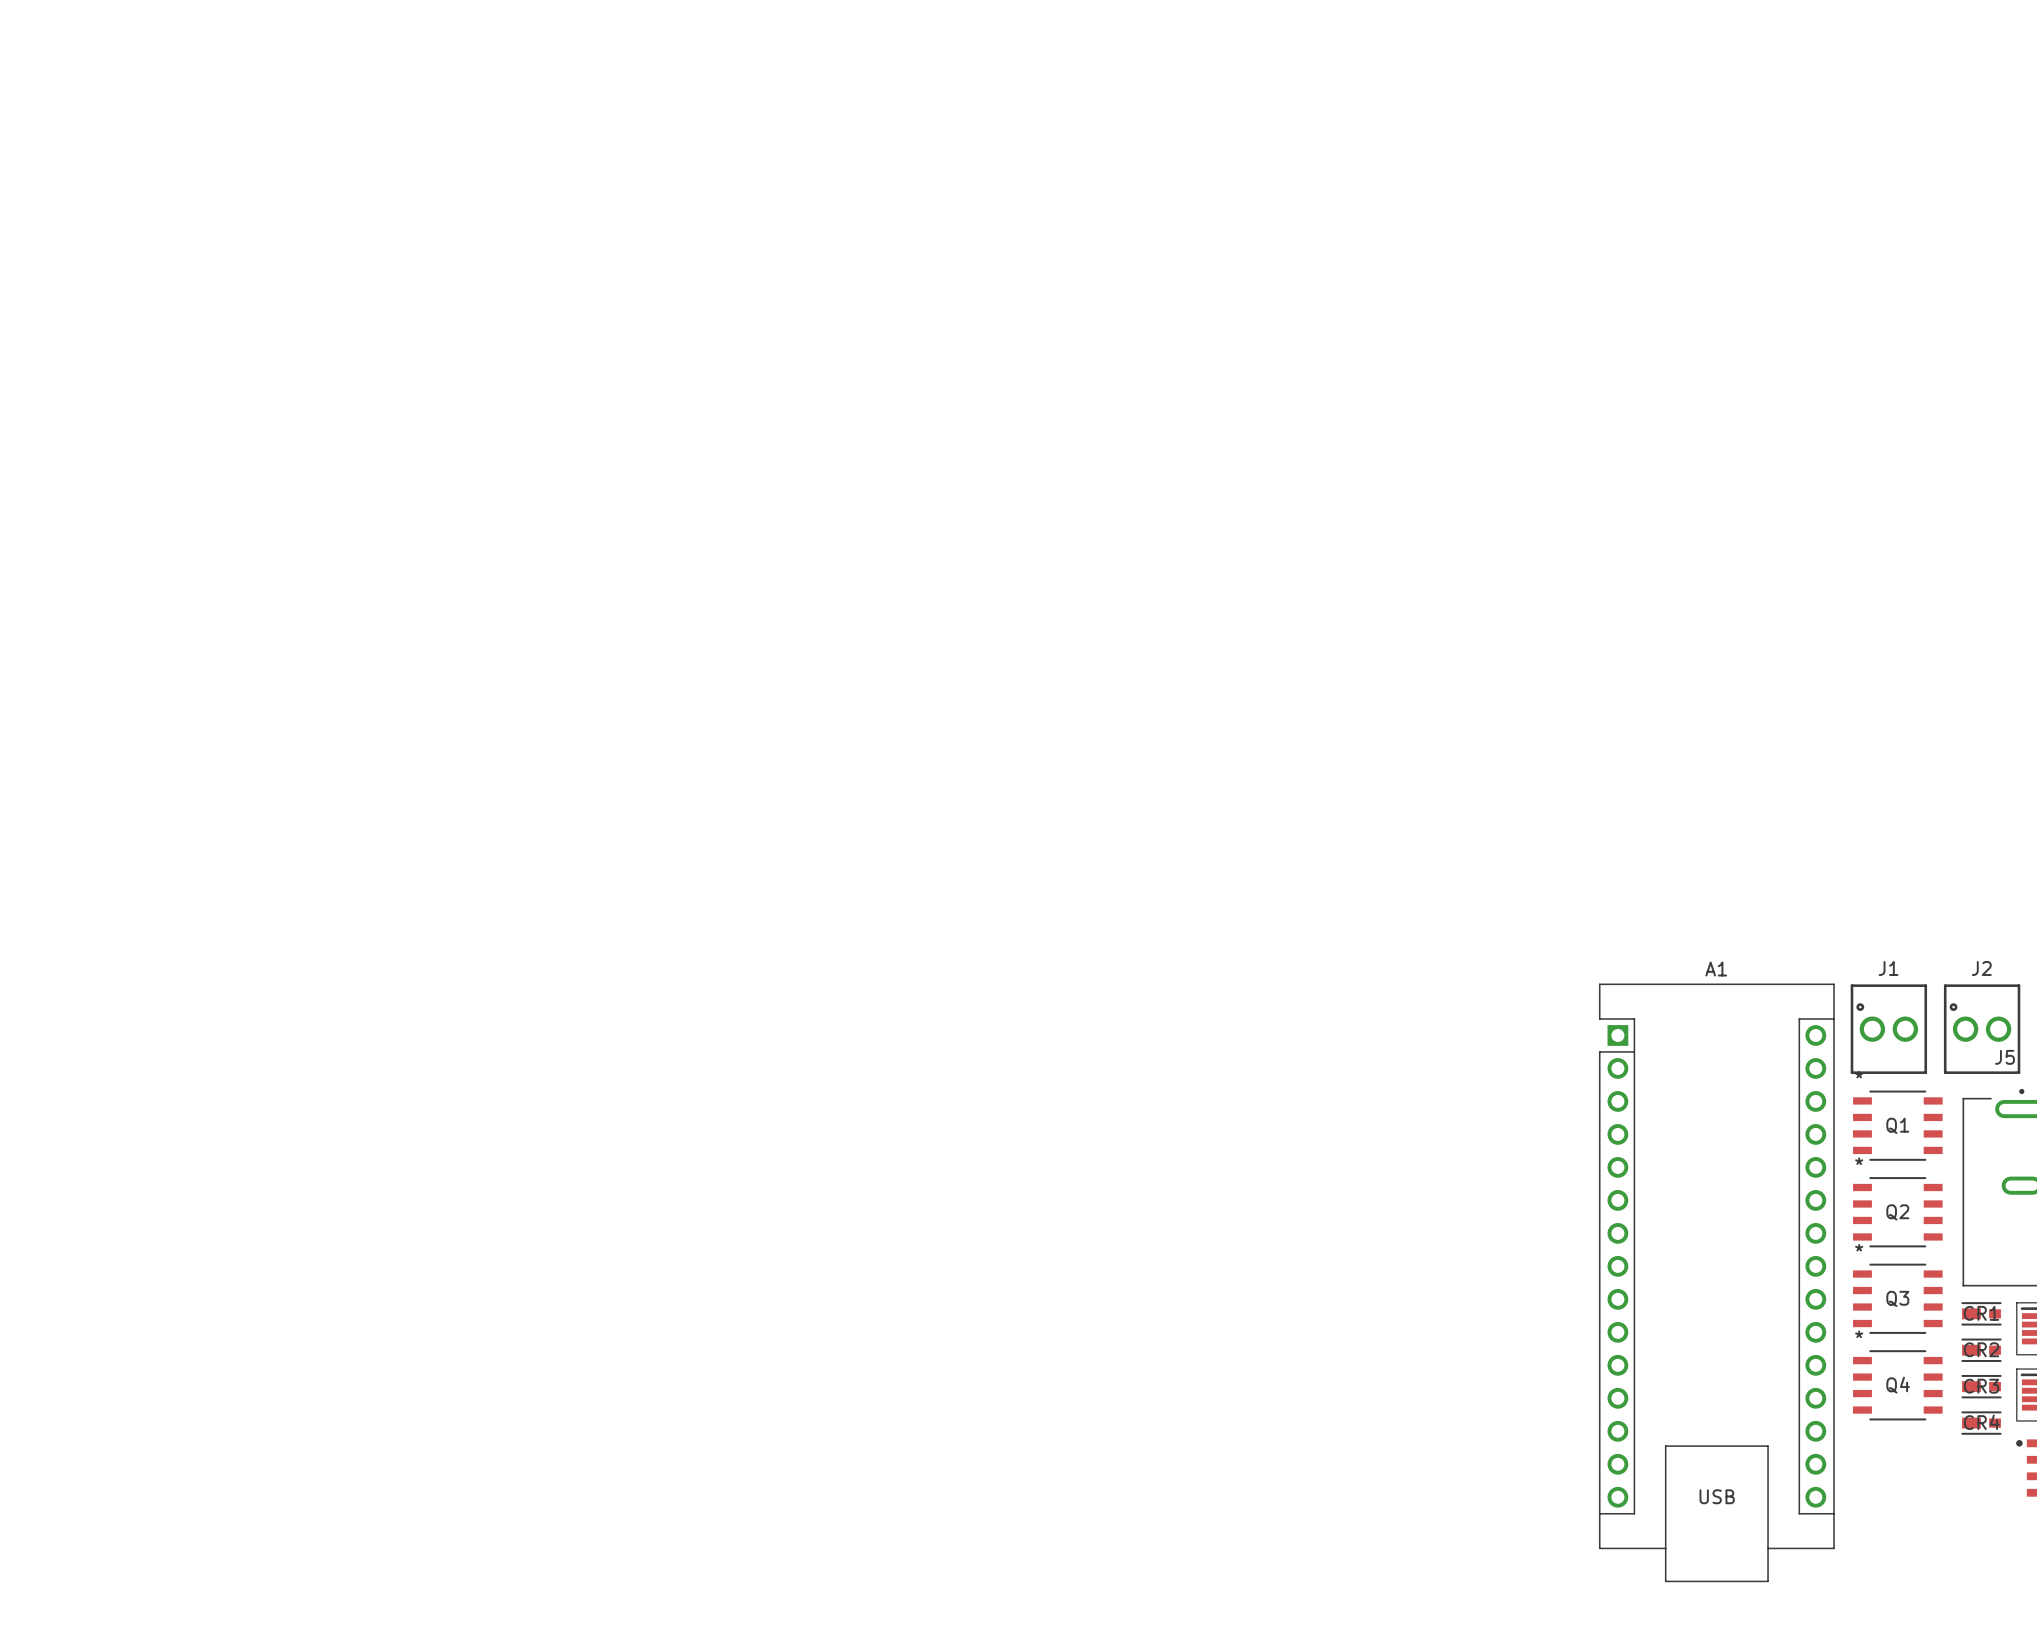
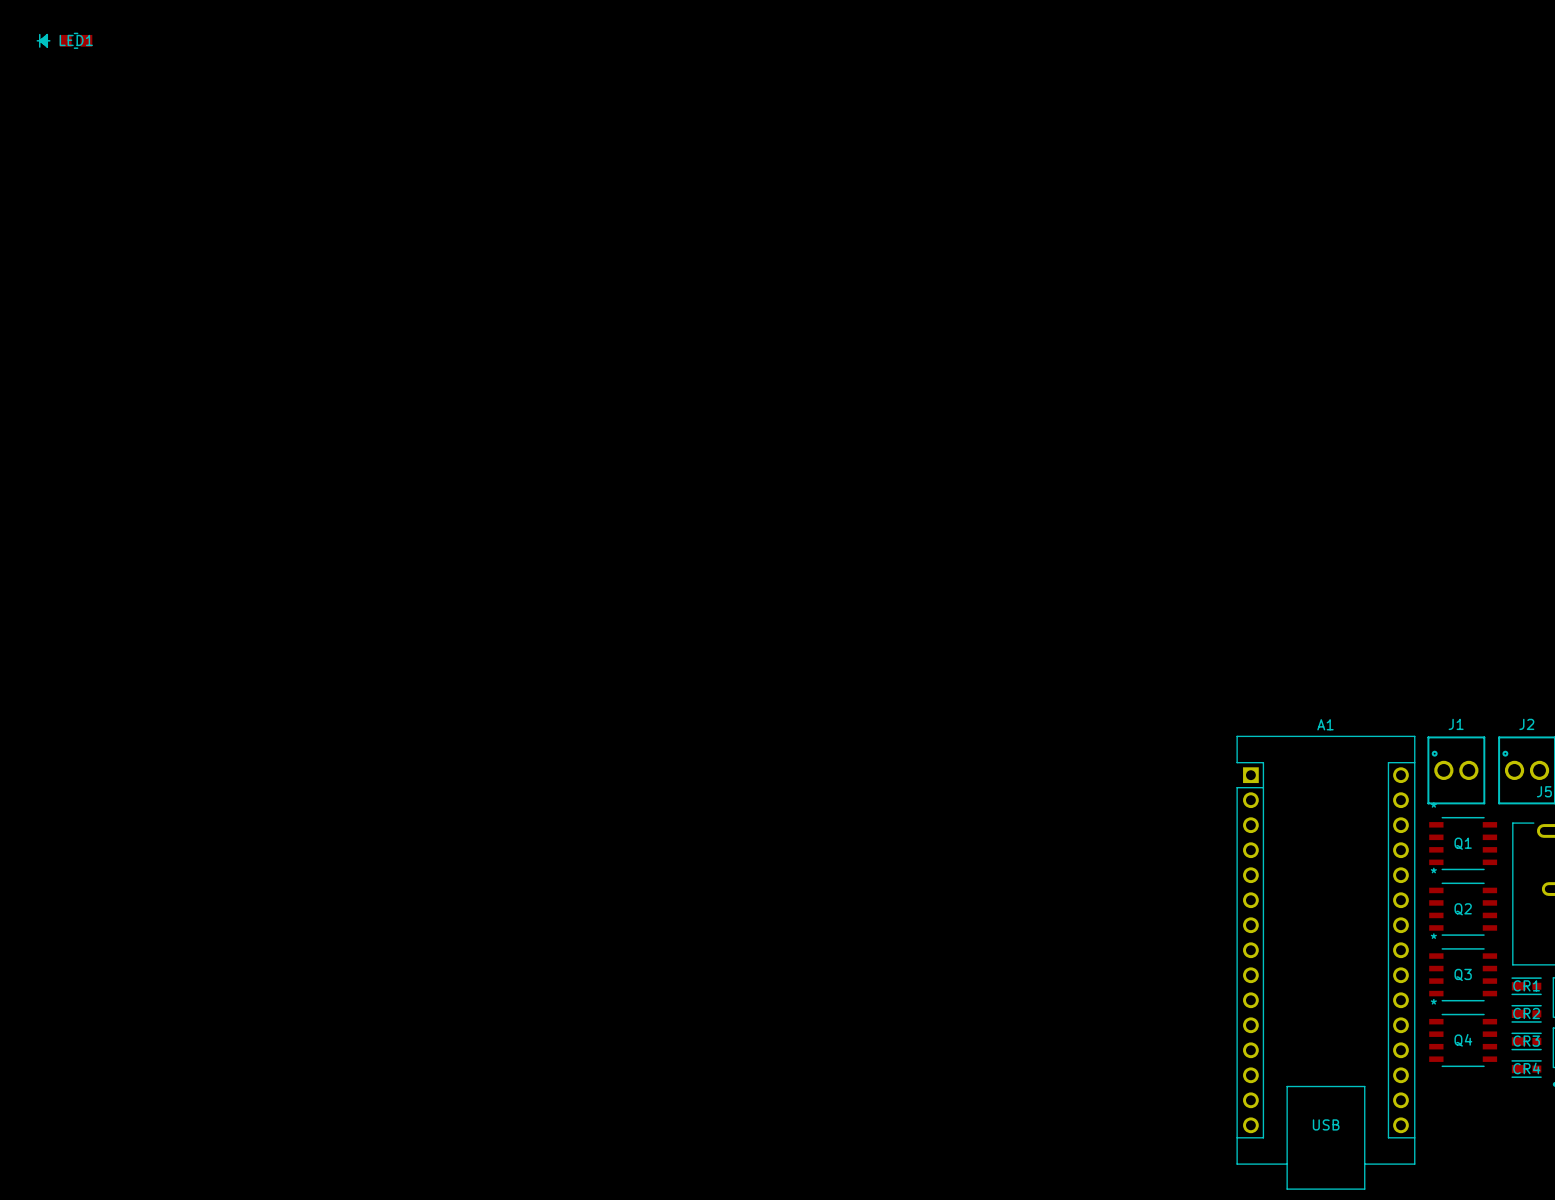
LED1: none -> (64, 40)

